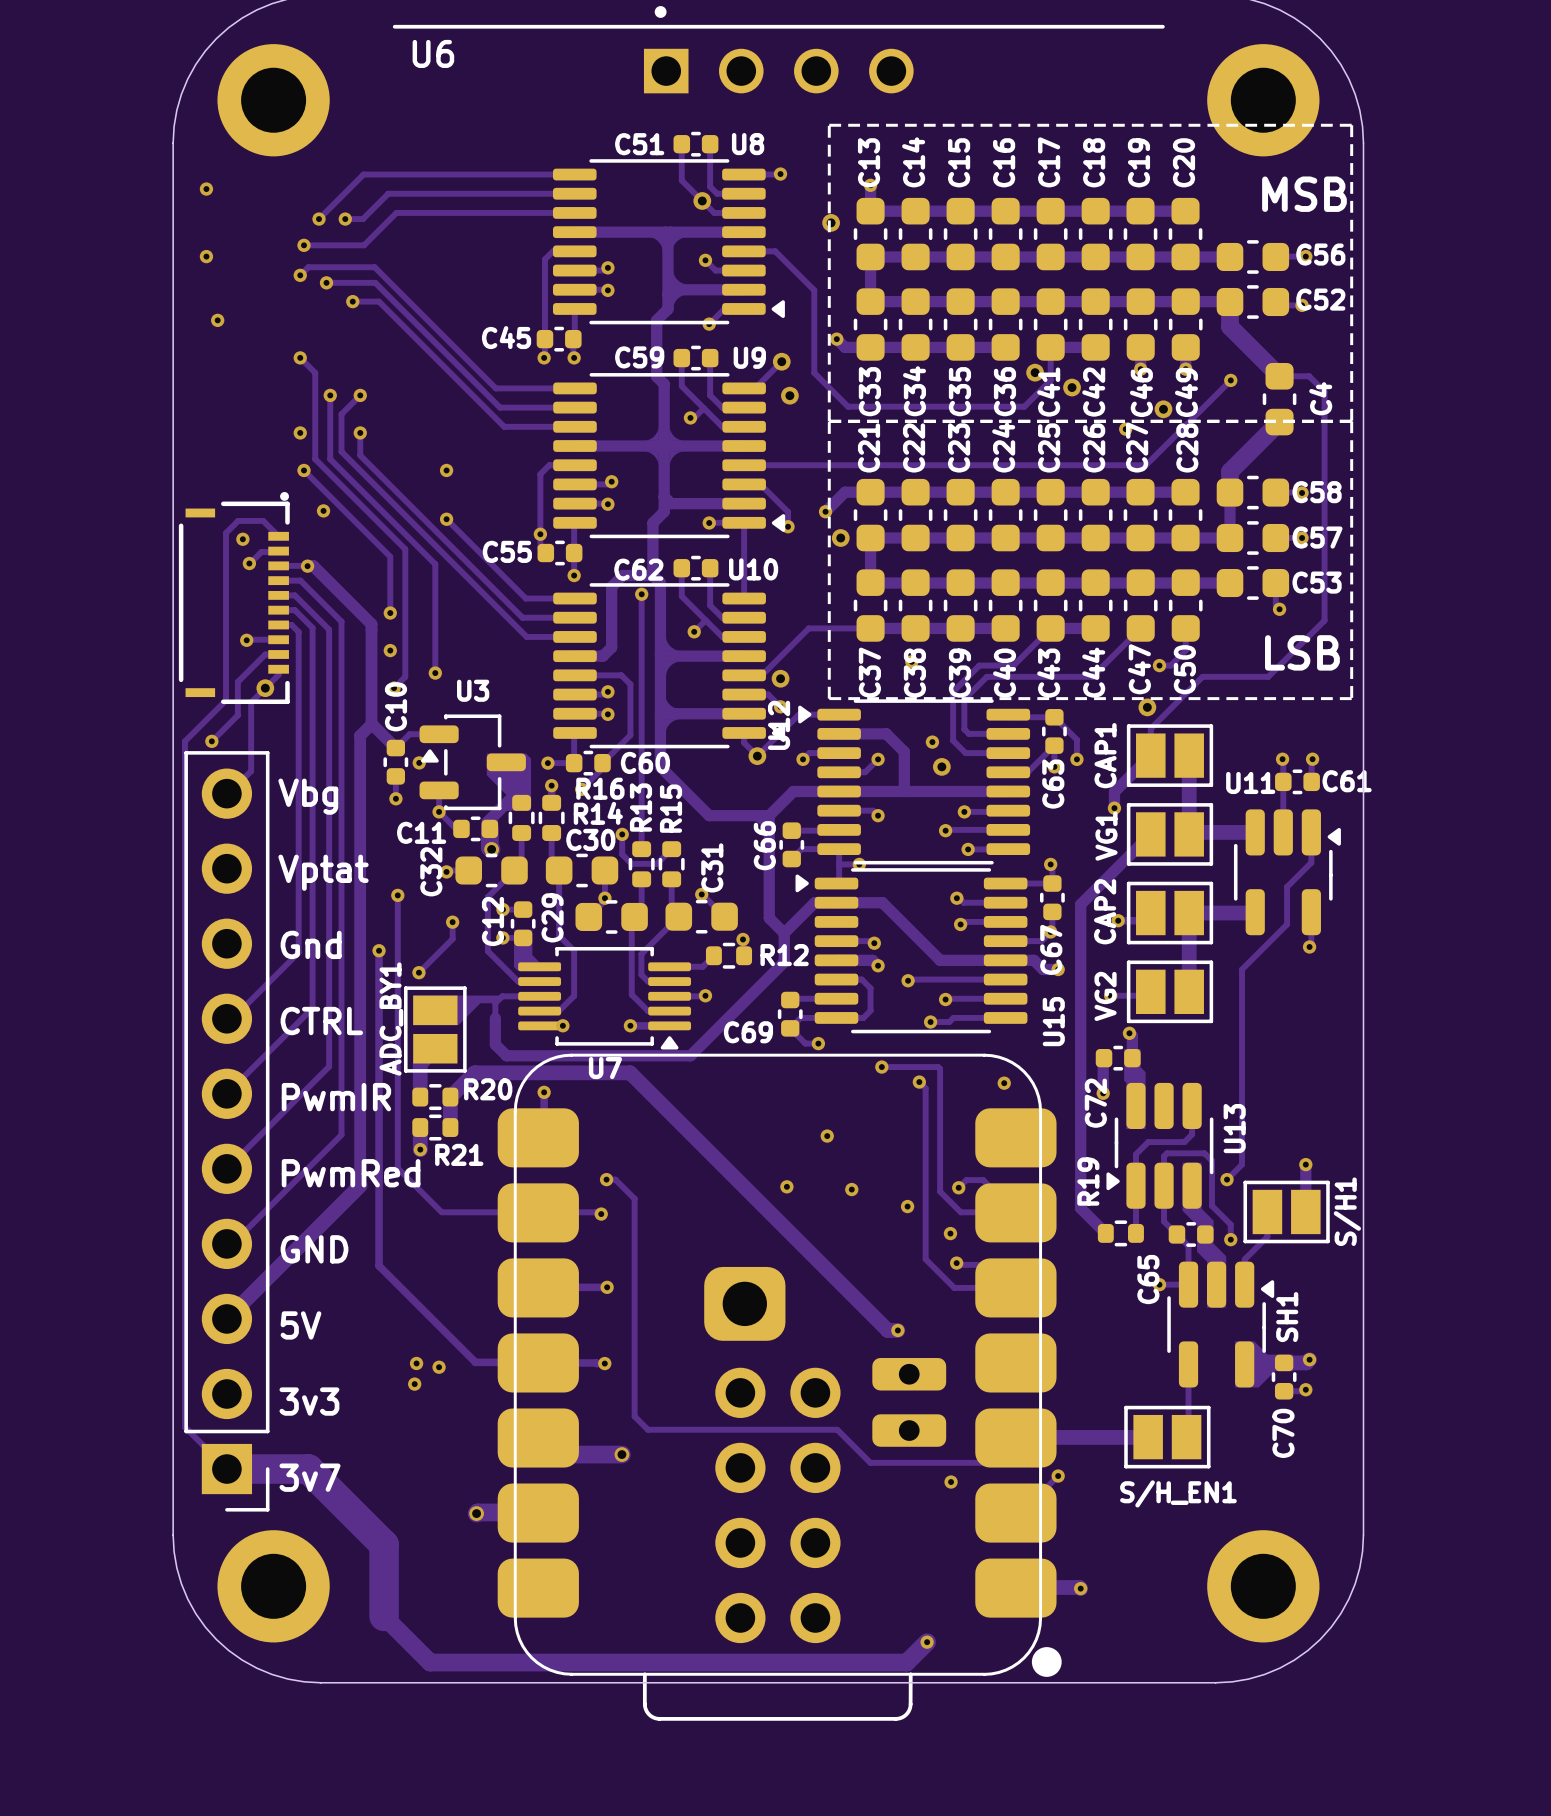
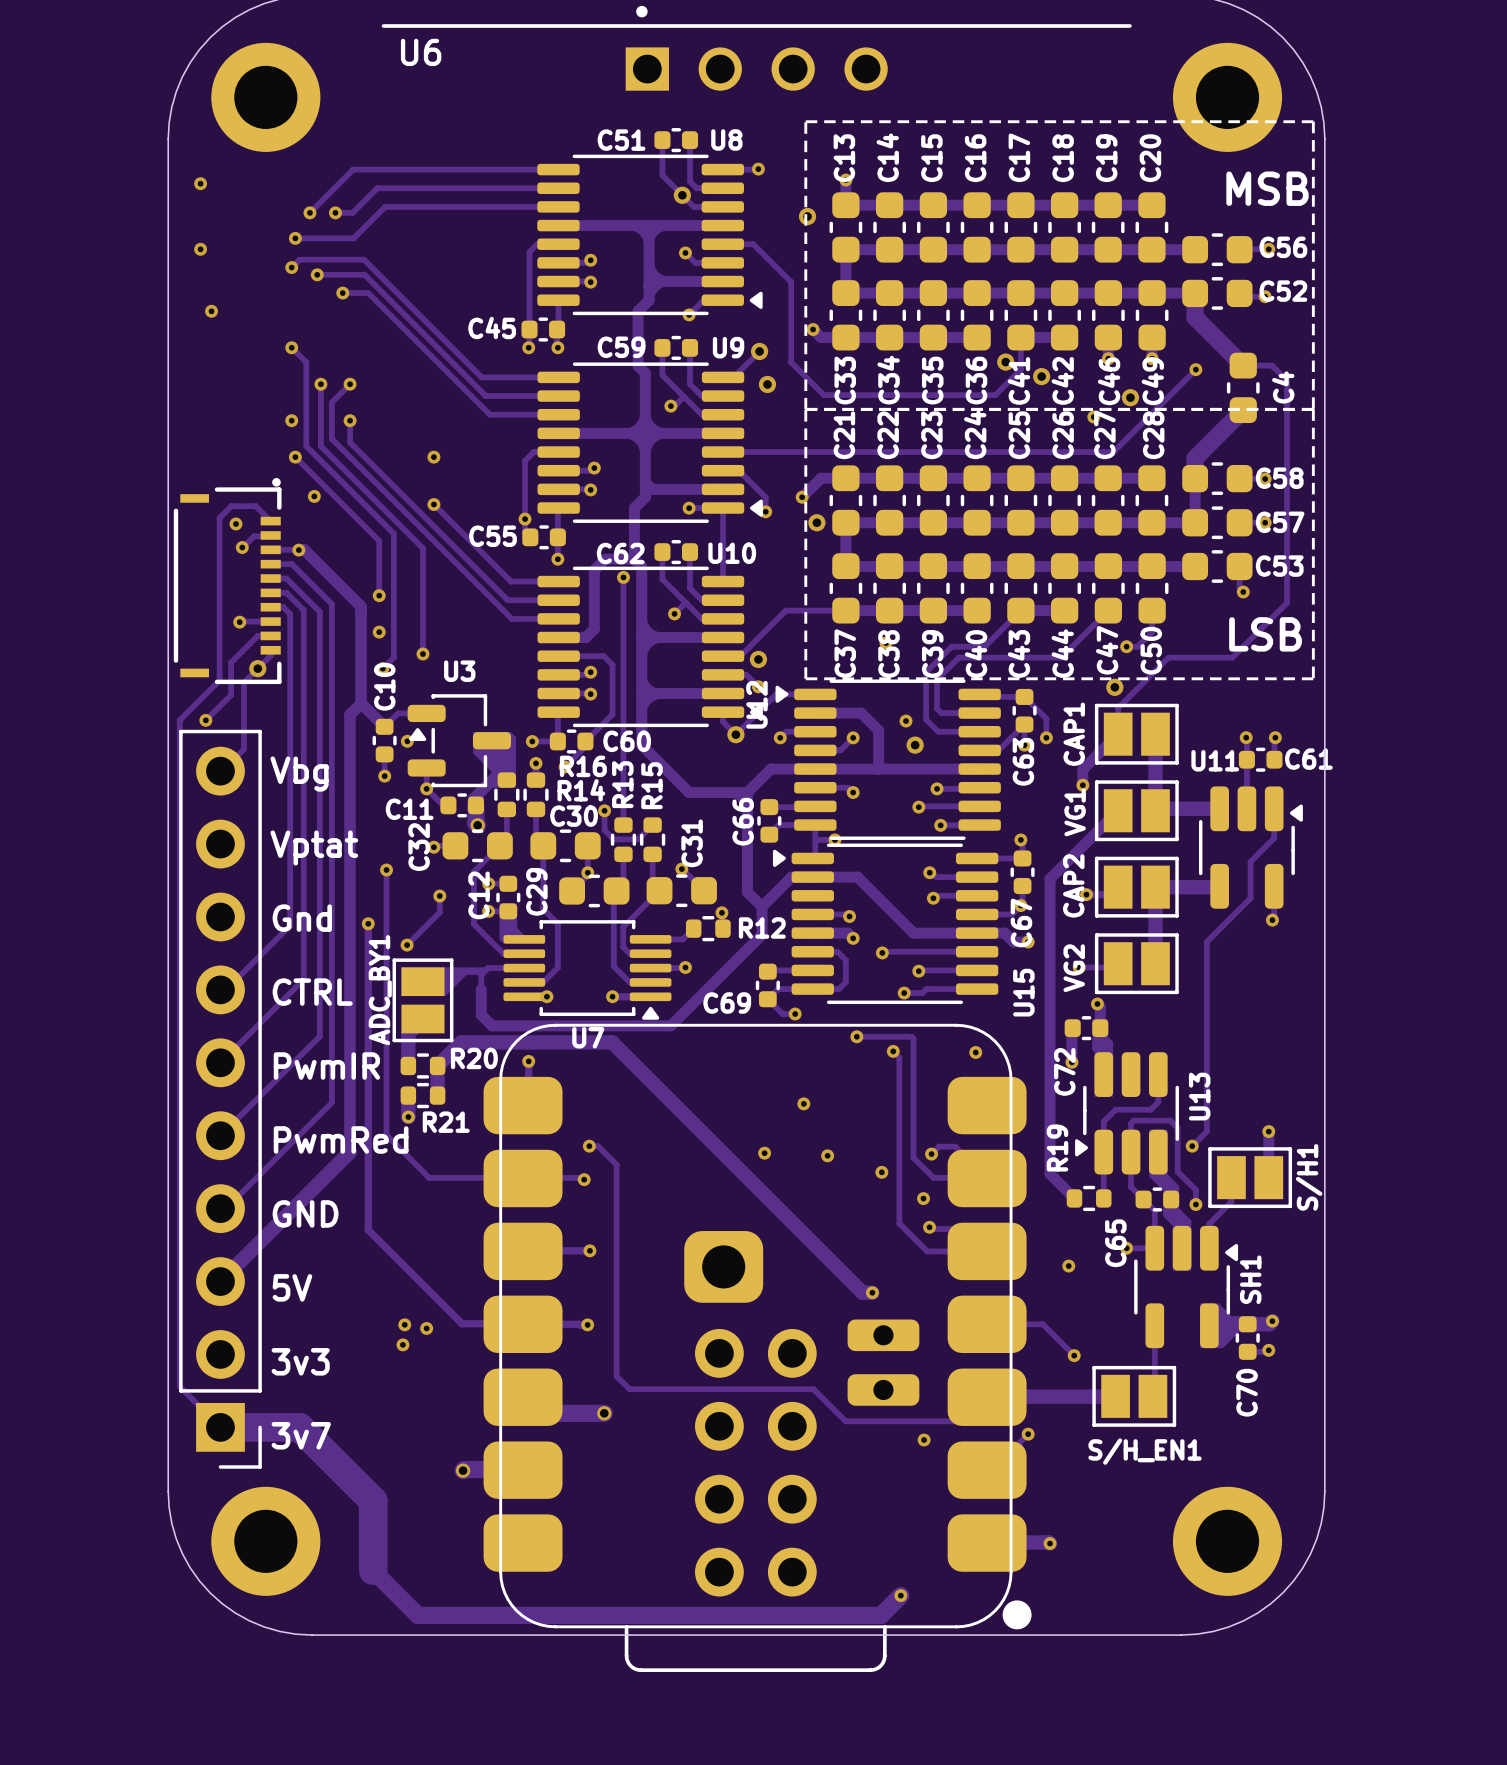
via: none -> (1068, 1266)
track: none -> (987, 1324) (1042, 1324) (1074, 1355)
via: none -> (1074, 1355)

